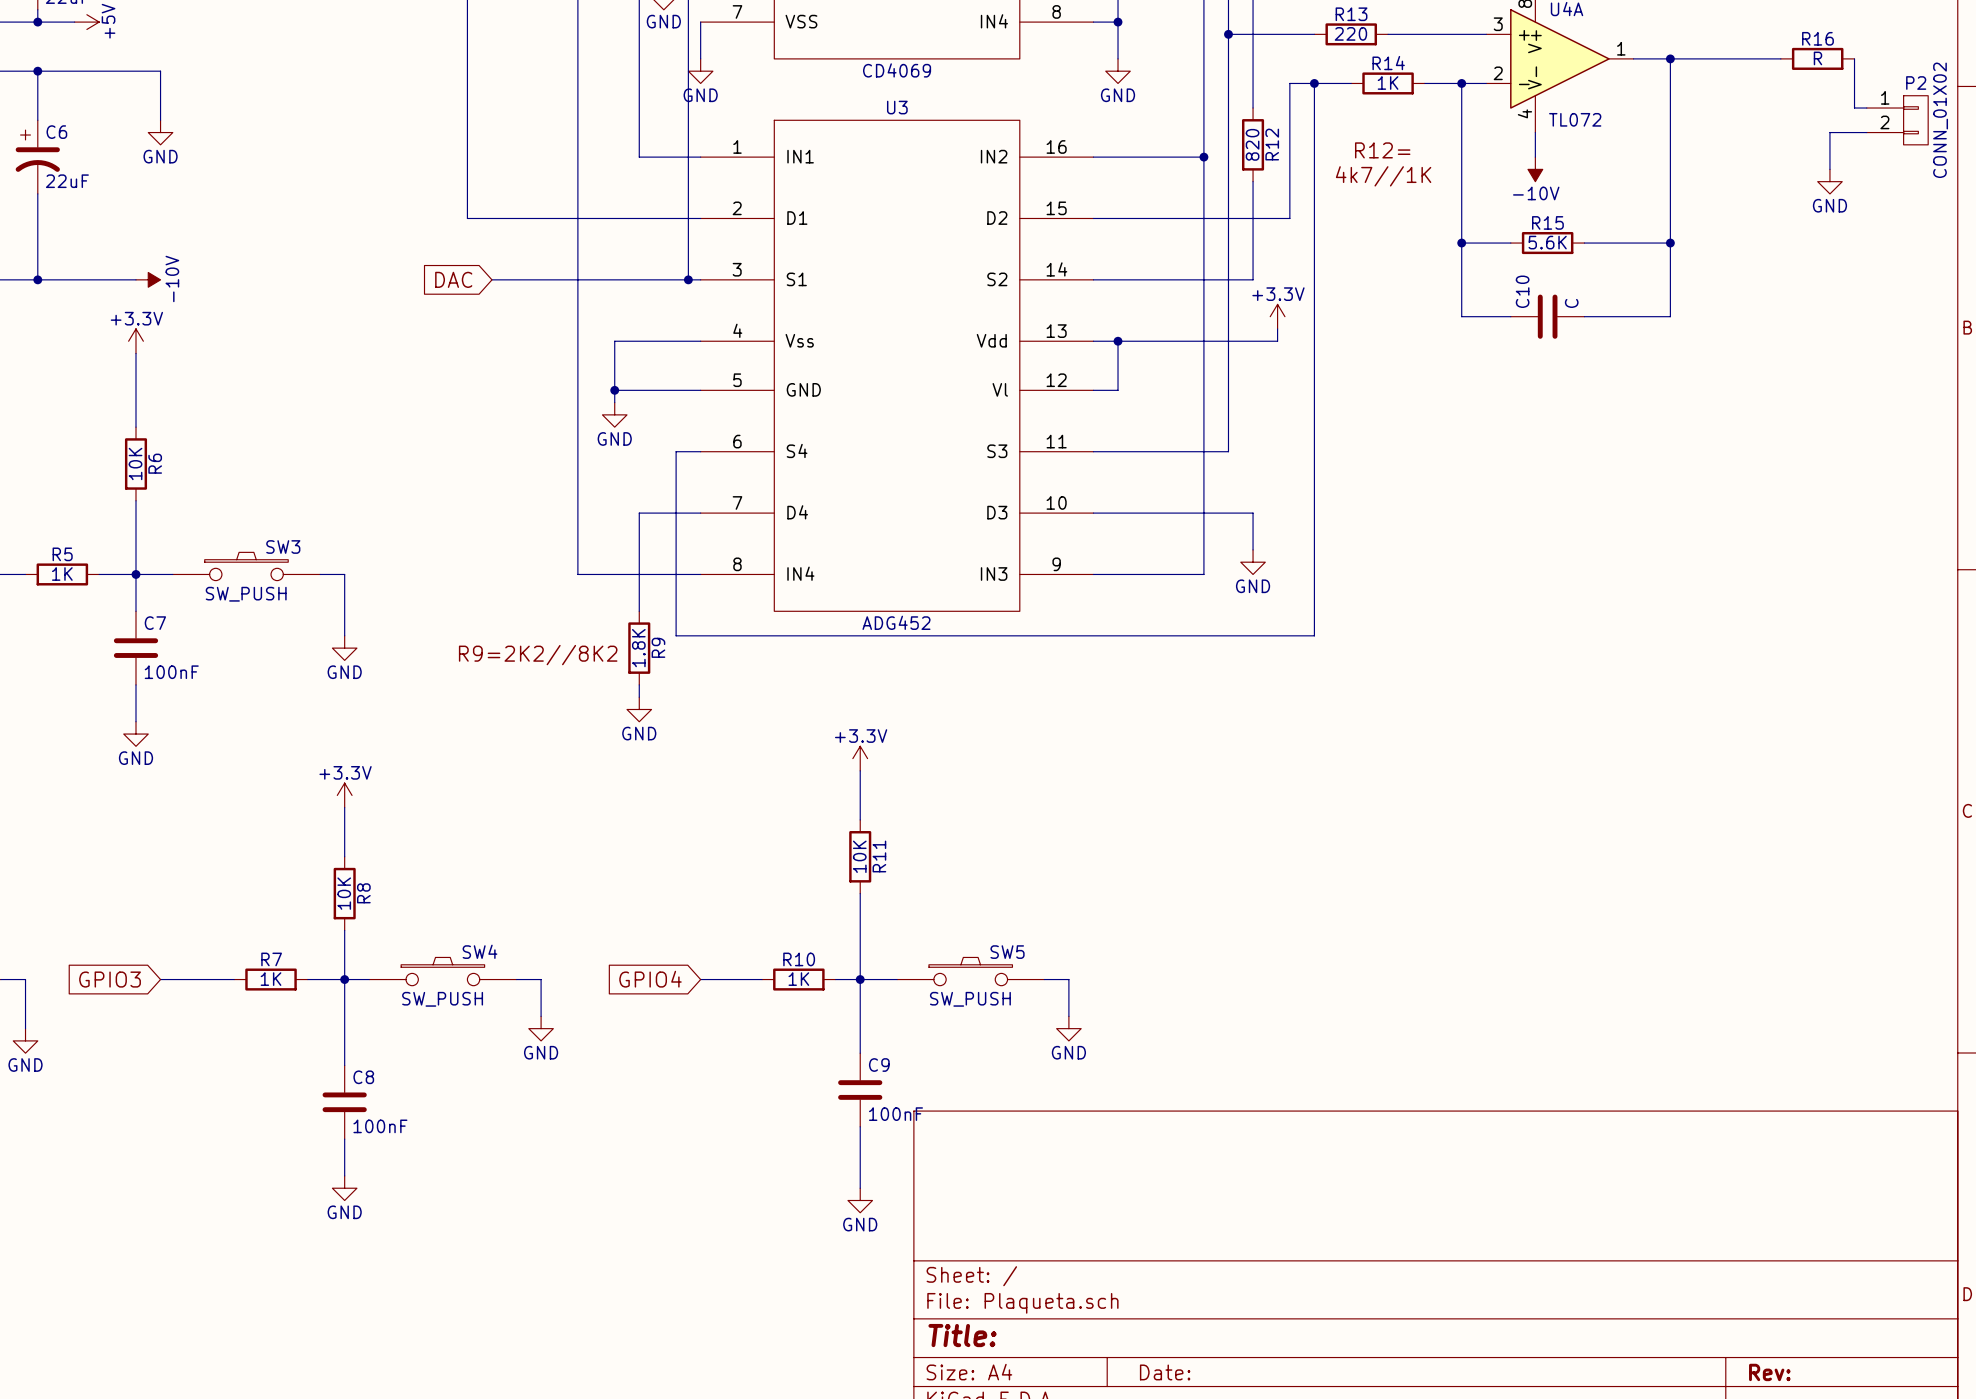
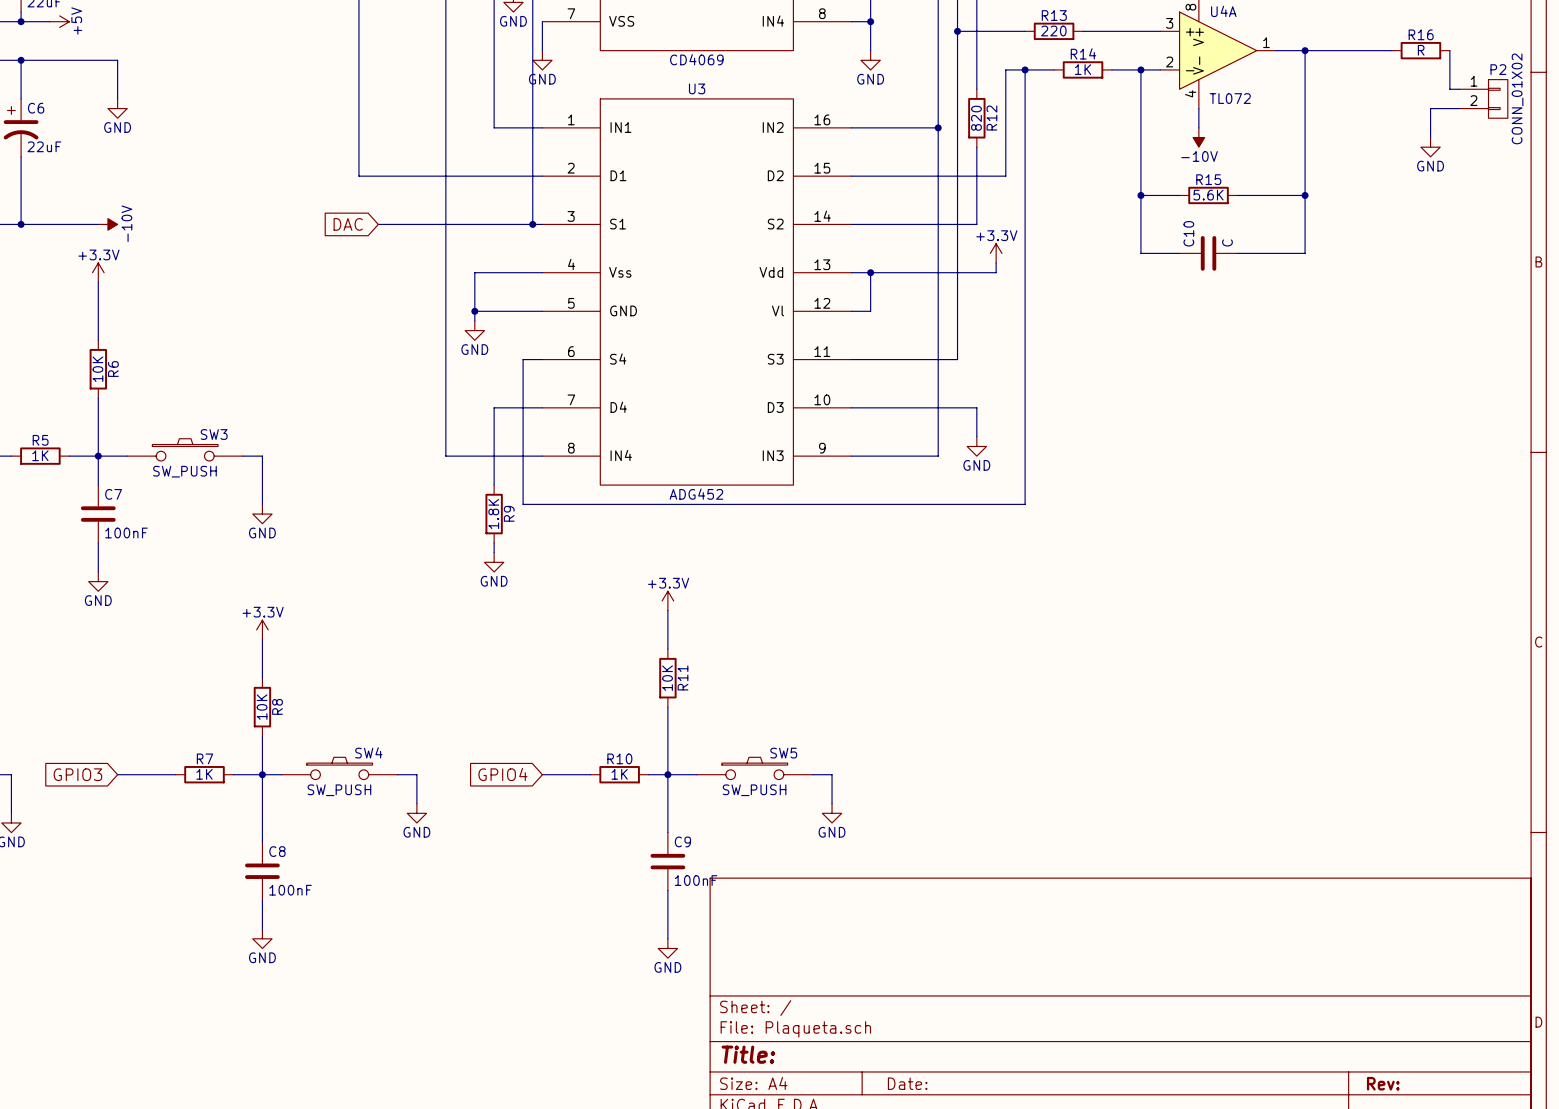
label: R12= (1382, 150) -> none
label: 4k7//1K (1383, 176) -> none
label: R9=2K2//8K2 (538, 655) -> none

